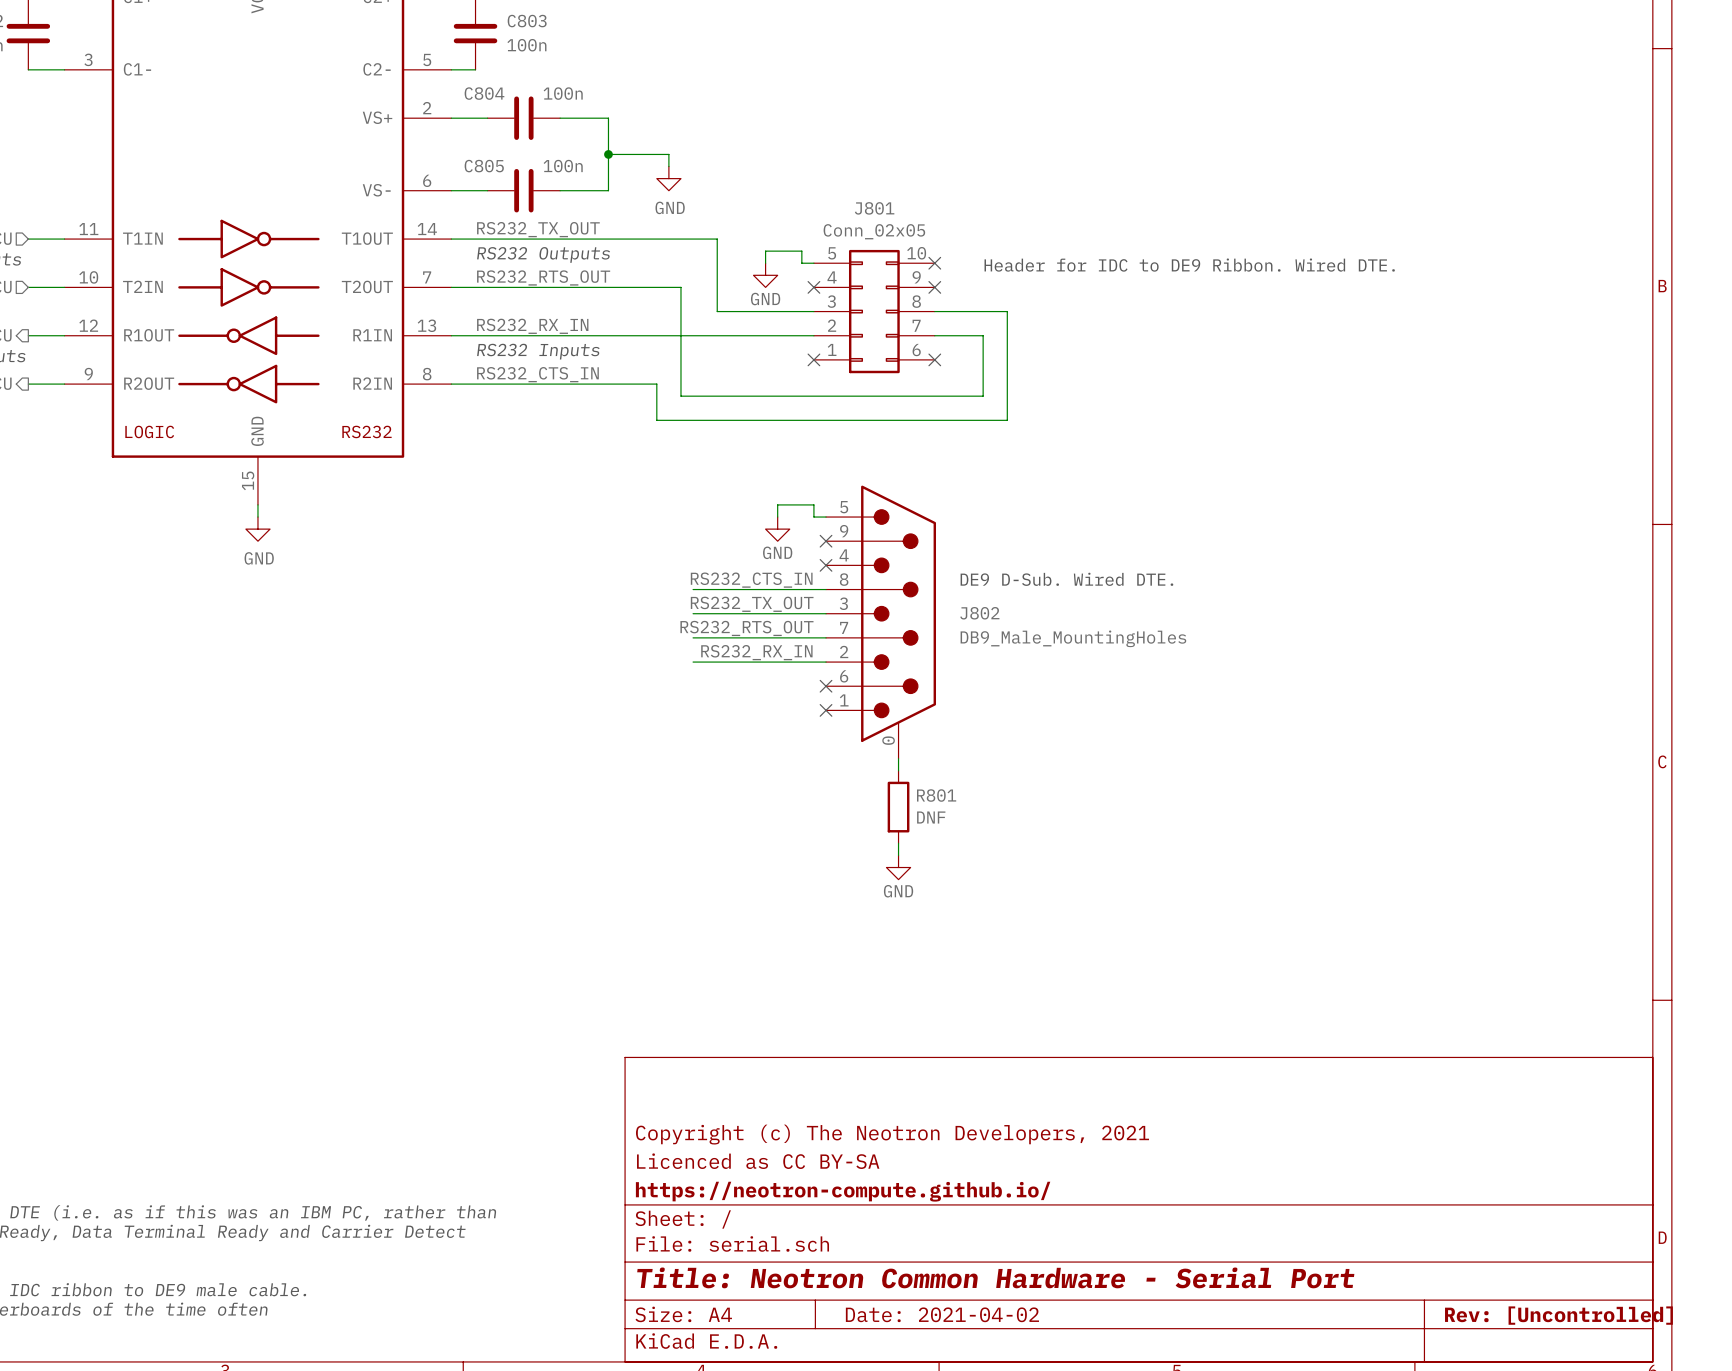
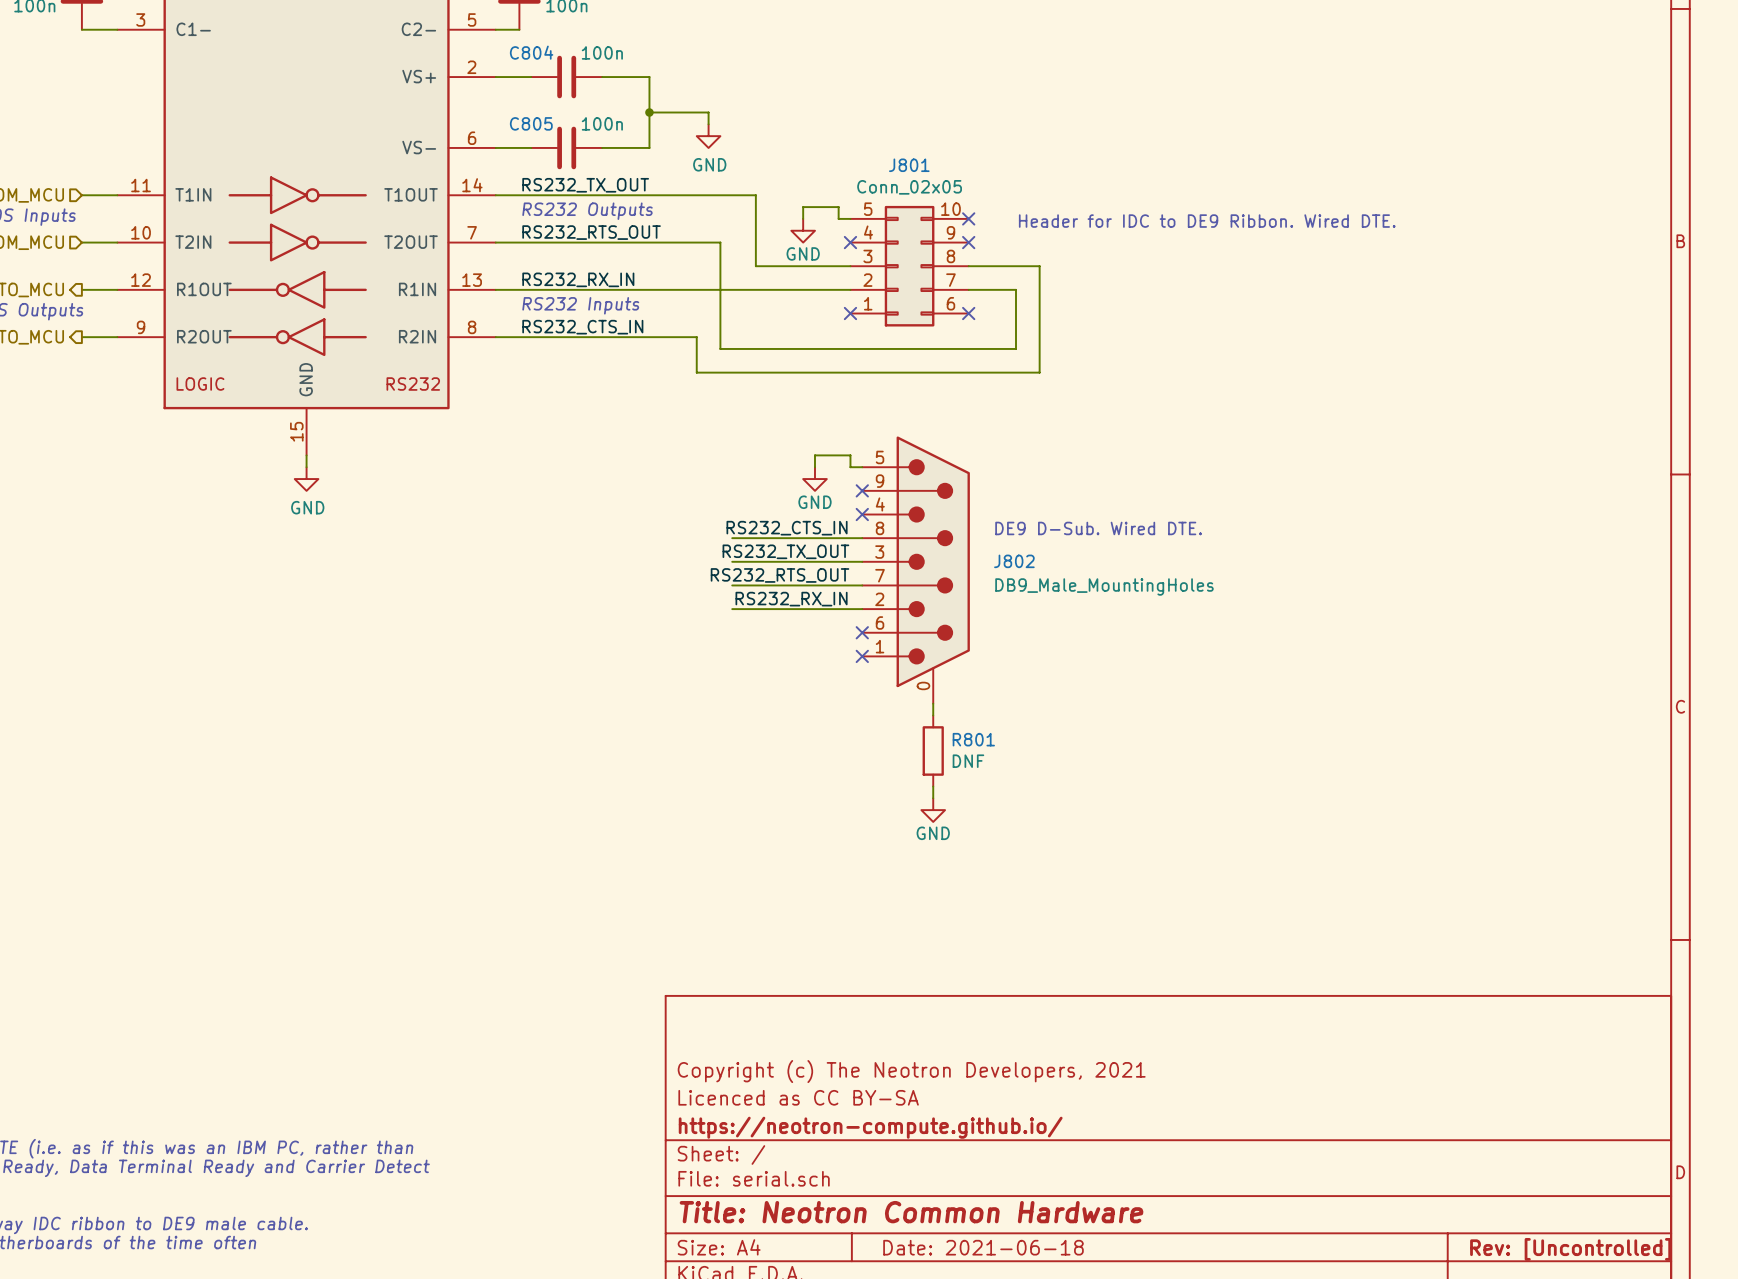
title block: Title: Neotron Common Hardware - Serial Port (995, 1277) -> Title: Neotron Common Hardware (911, 1212)
title block: Date: 2021-04-02 (942, 1314) -> Date: 2021-06-18 (983, 1247)

